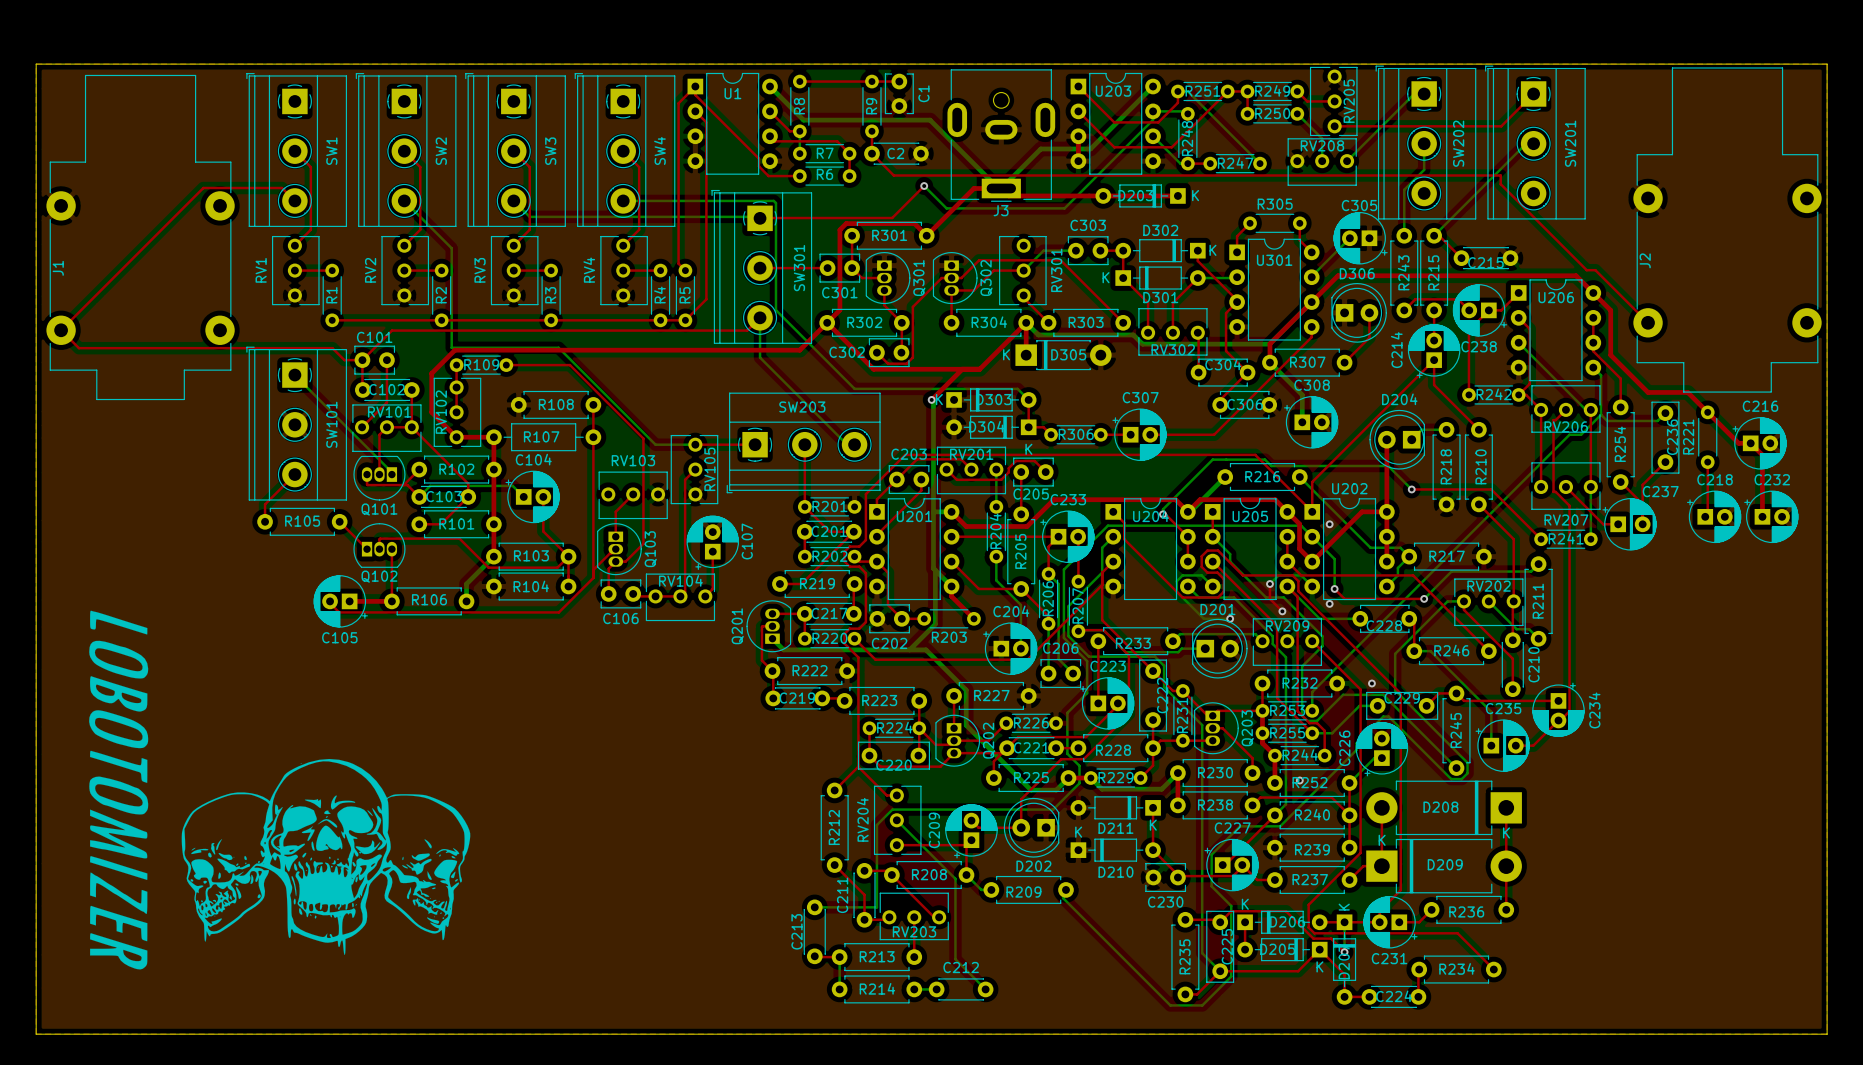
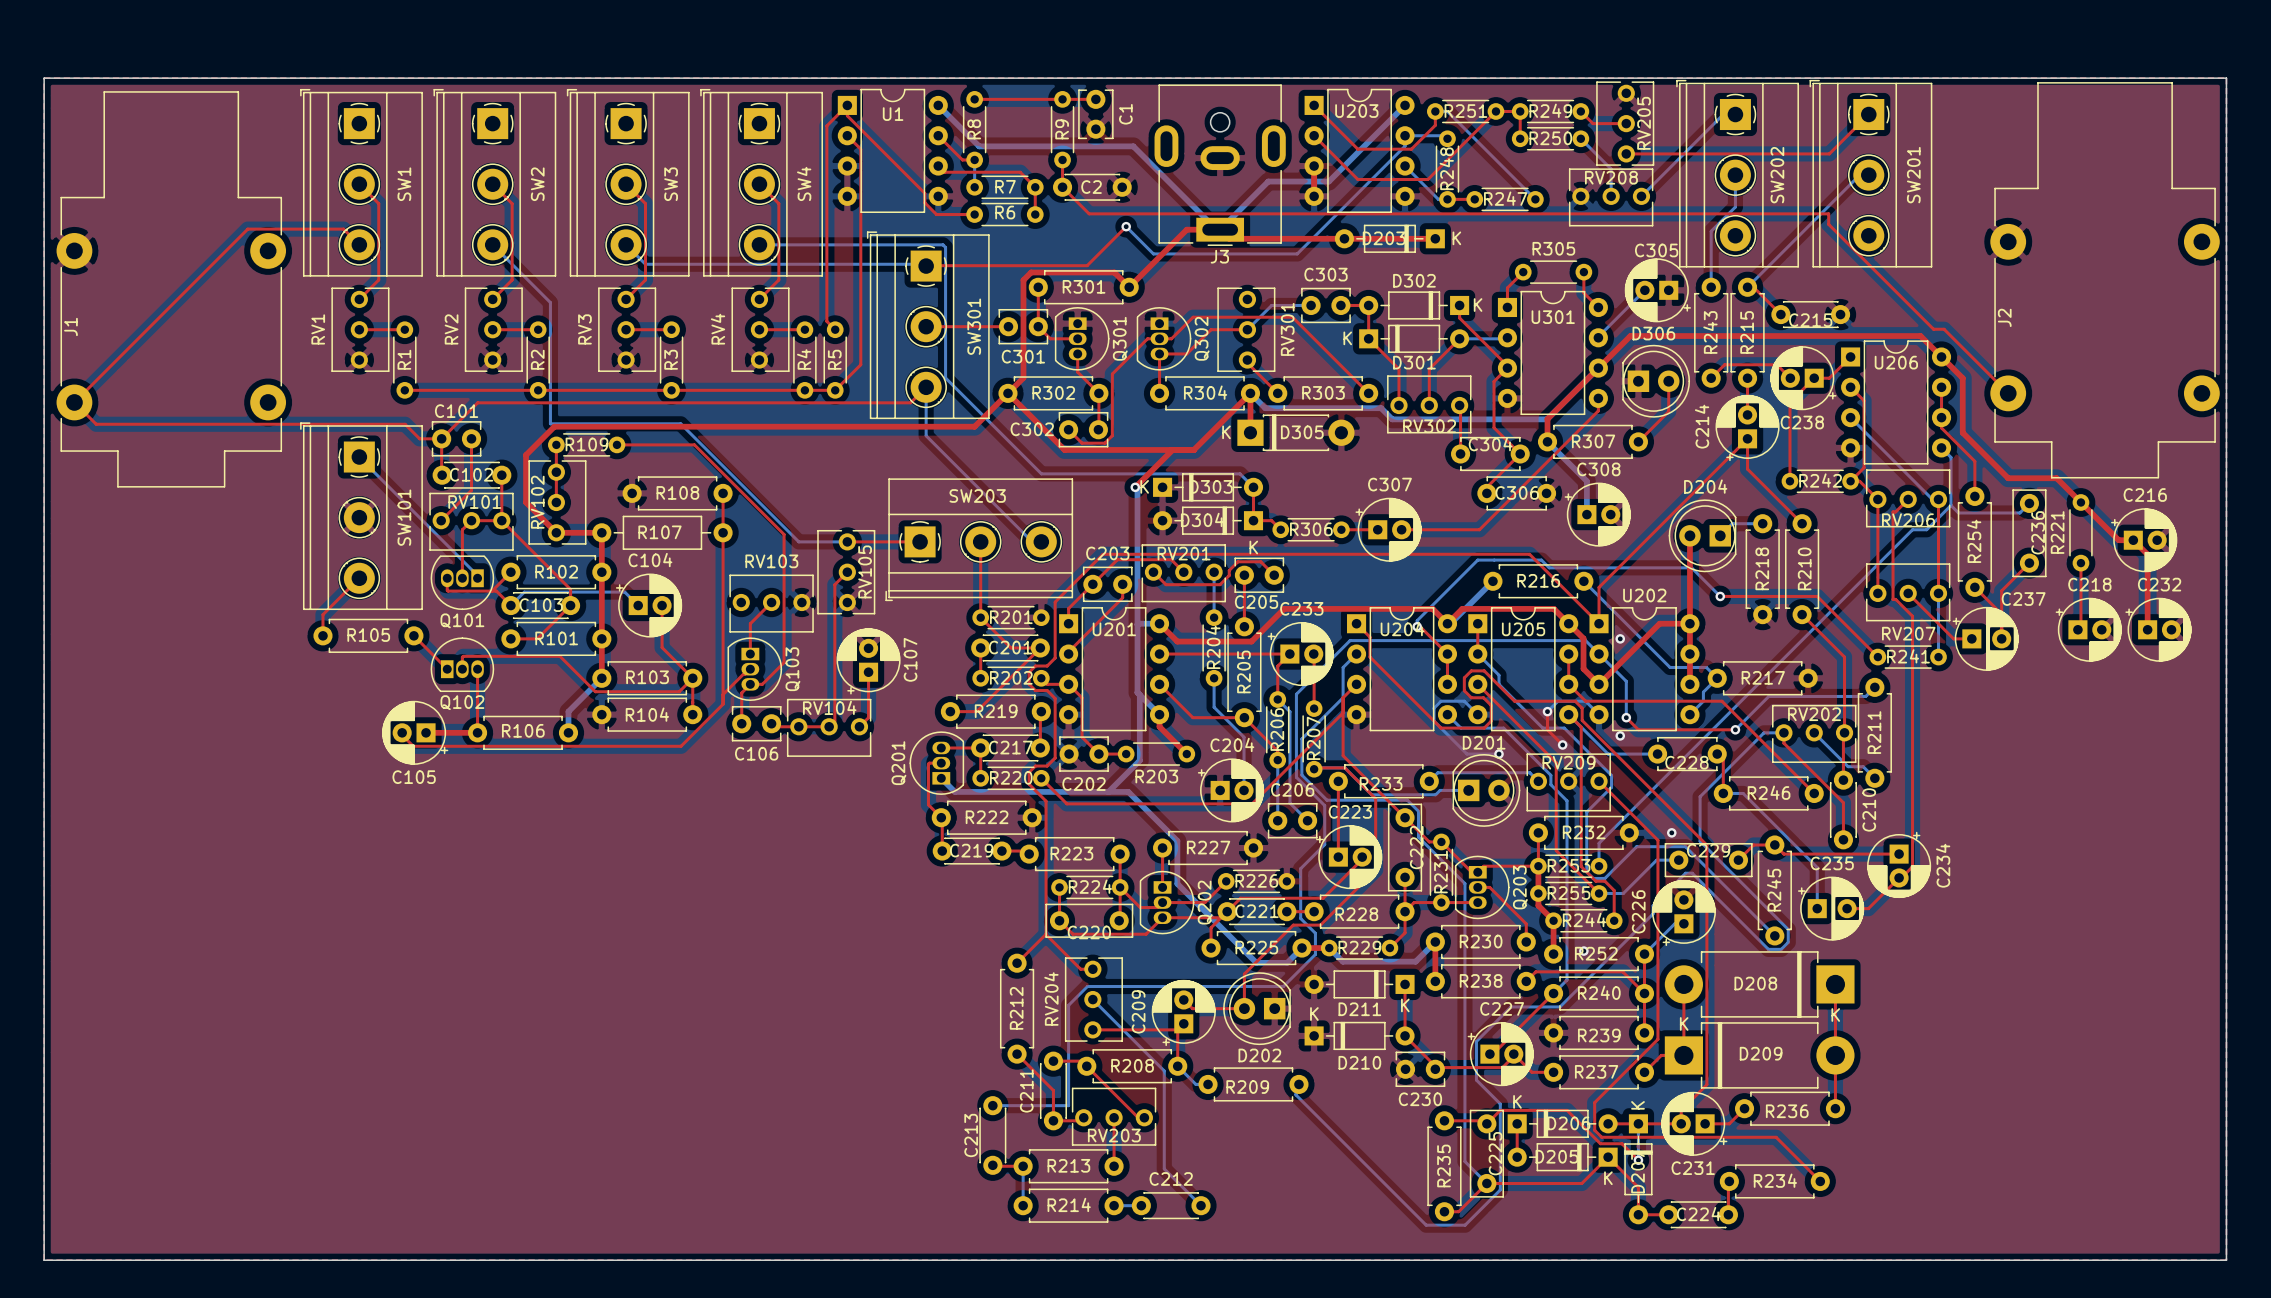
drawing: [89, 610, 471, 970] -> none

